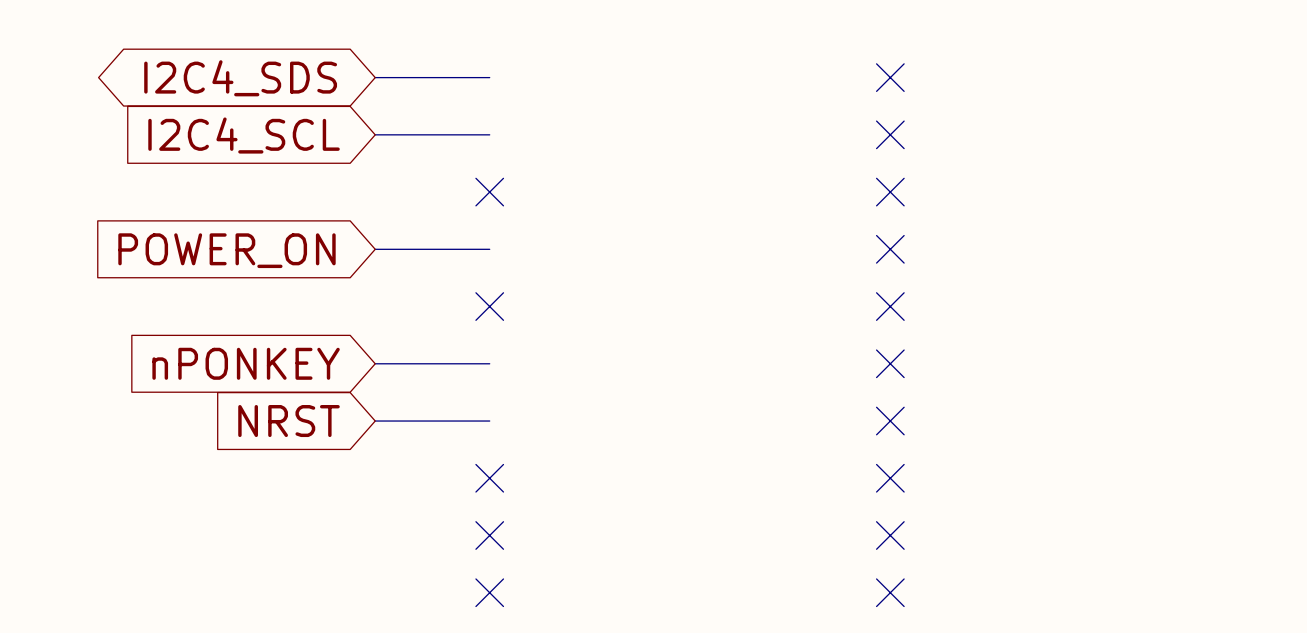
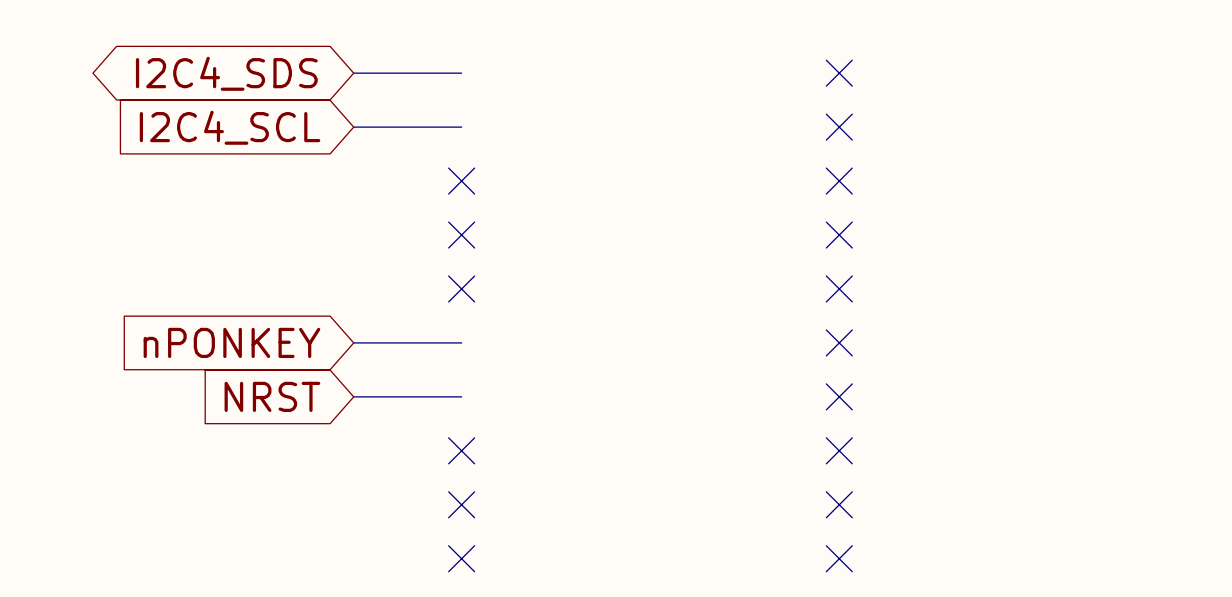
wire: (375, 249) (489, 249) -> none
no-connect mark: none -> (461, 235)
global label: POWER_ON (226, 250) -> none

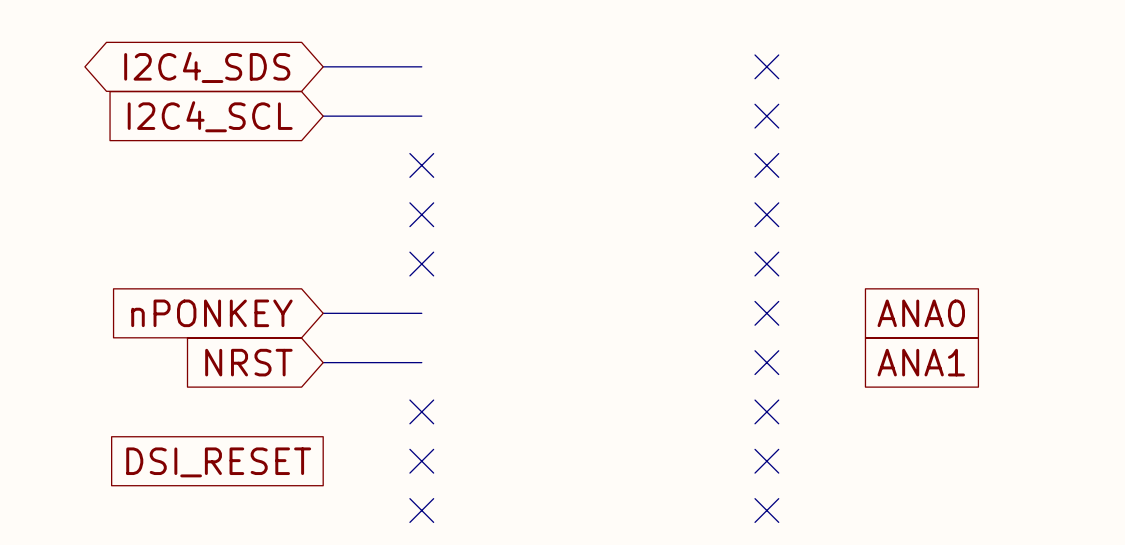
global label: none -> ANA0 (921, 313)
global label: none -> ANA1 (921, 362)
global label: none -> DSI_RESET (218, 462)

